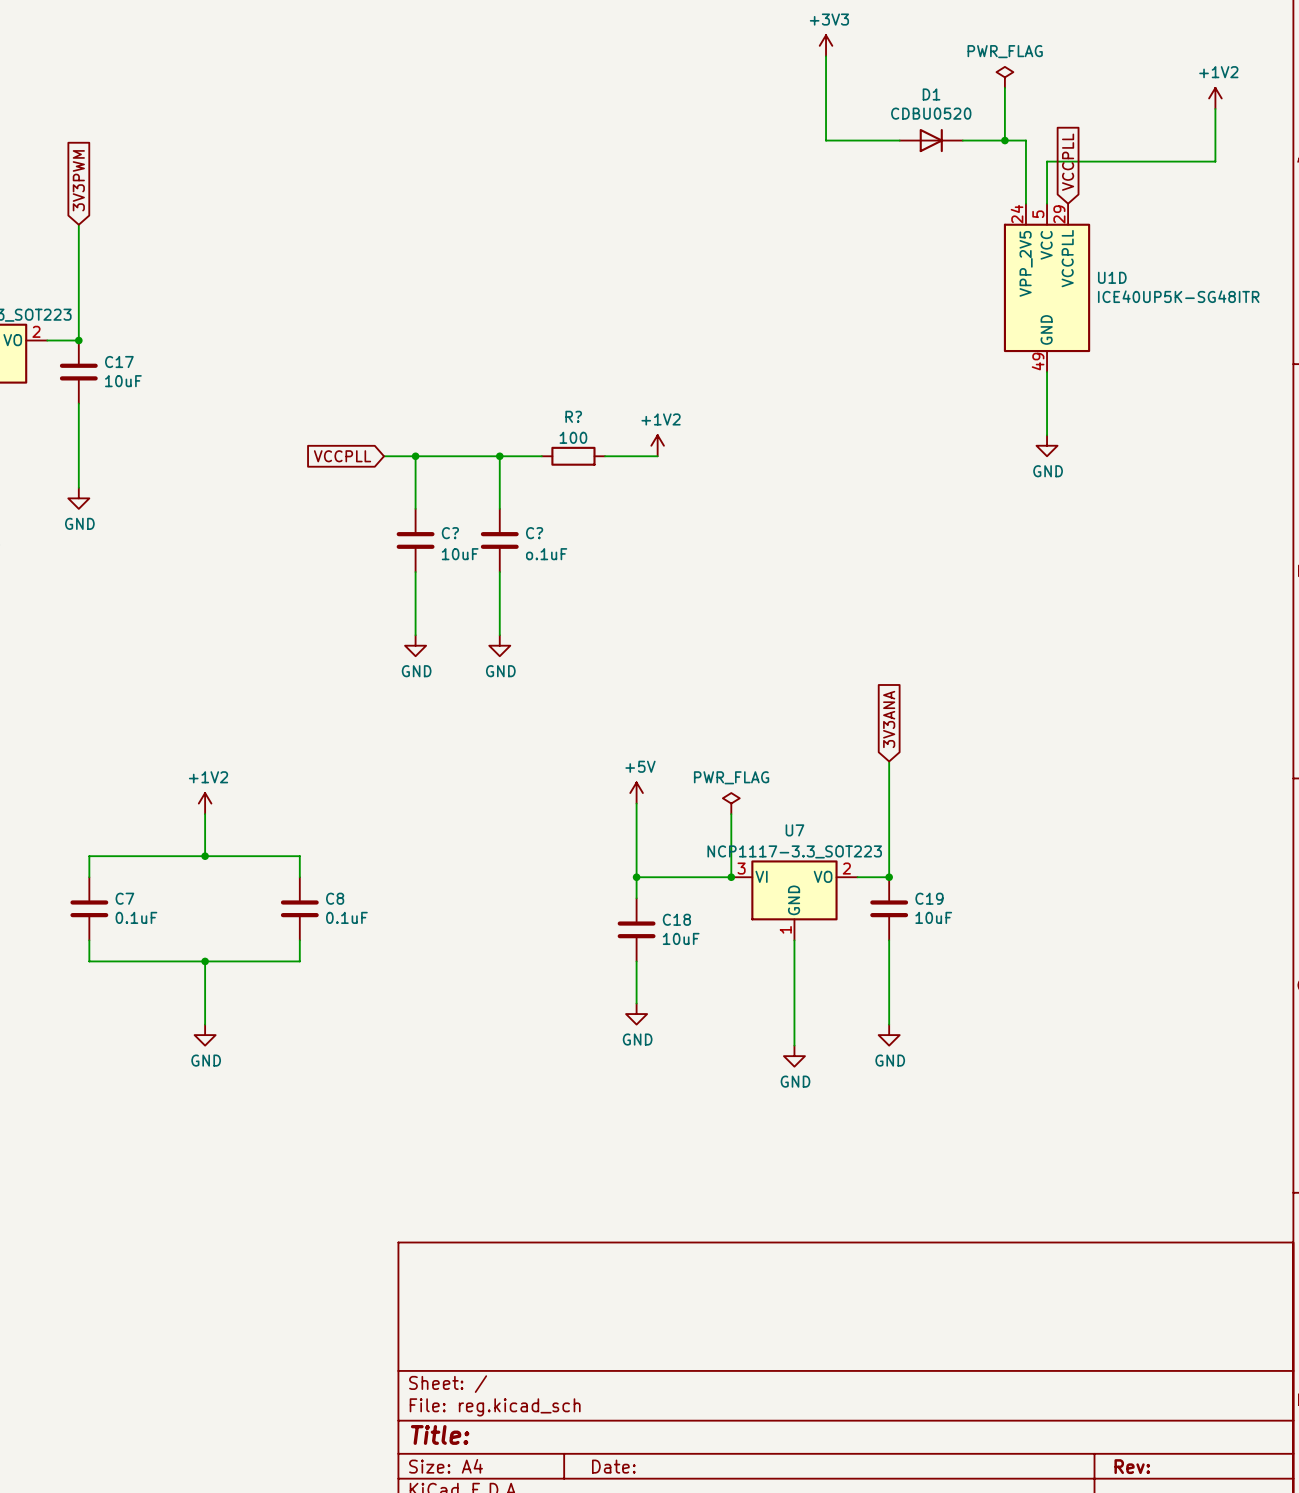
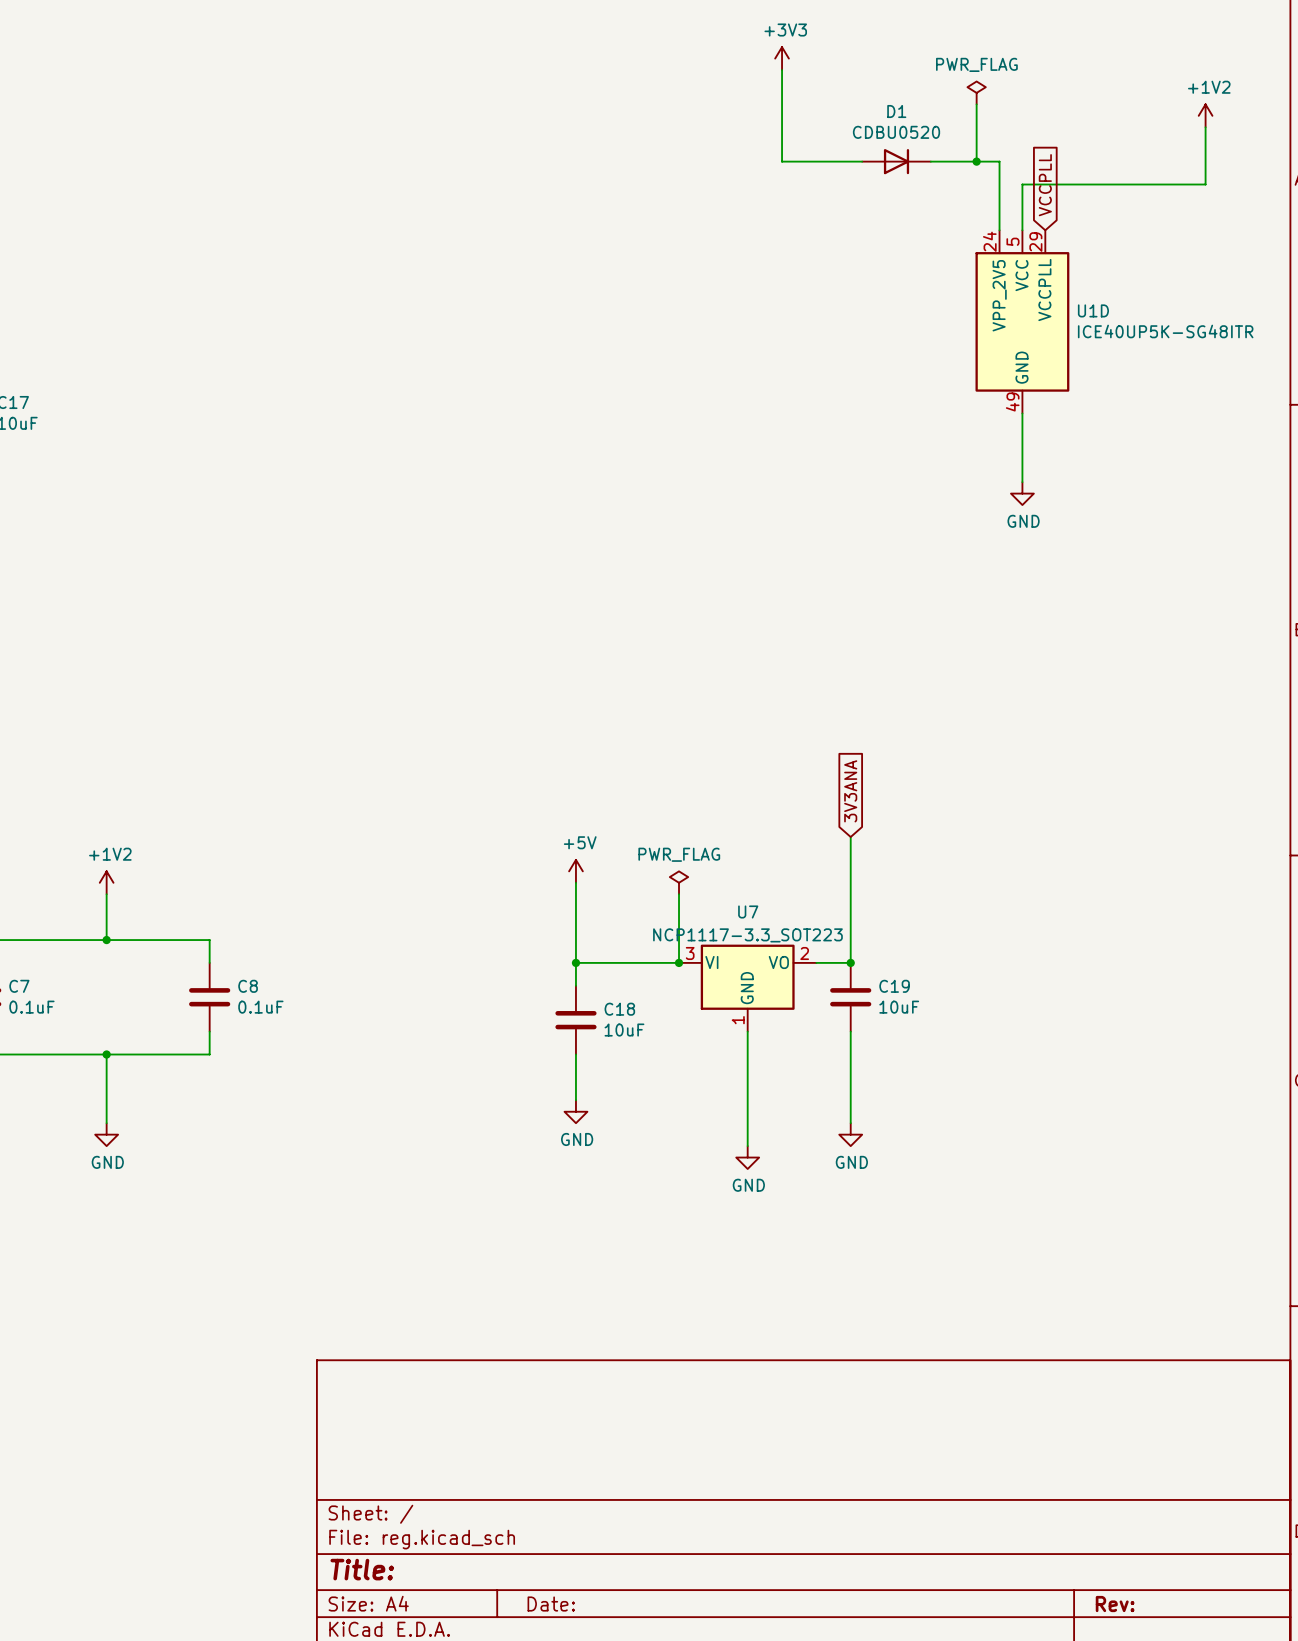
power symbol: +1V2 (657, 445) -> none
global label: VCCPLL (342, 456) -> none
wire: (384, 456) (541, 456) -> none
wire: (415, 456) (415, 508) -> none
junction: (415, 456) -> none
wire: (499, 456) (499, 508) -> none
junction: (499, 456) -> none
R?: 100 (573, 456) -> none
wire: (605, 456) (657, 456) -> none
C?: 10uF (415, 540) -> none
C?: o.1uF (499, 540) -> none
wire: (415, 572) (415, 635) -> none
wire: (499, 572) (499, 635) -> none
power symbol: GND (415, 645) -> none
power symbol: GND (499, 645) -> none

